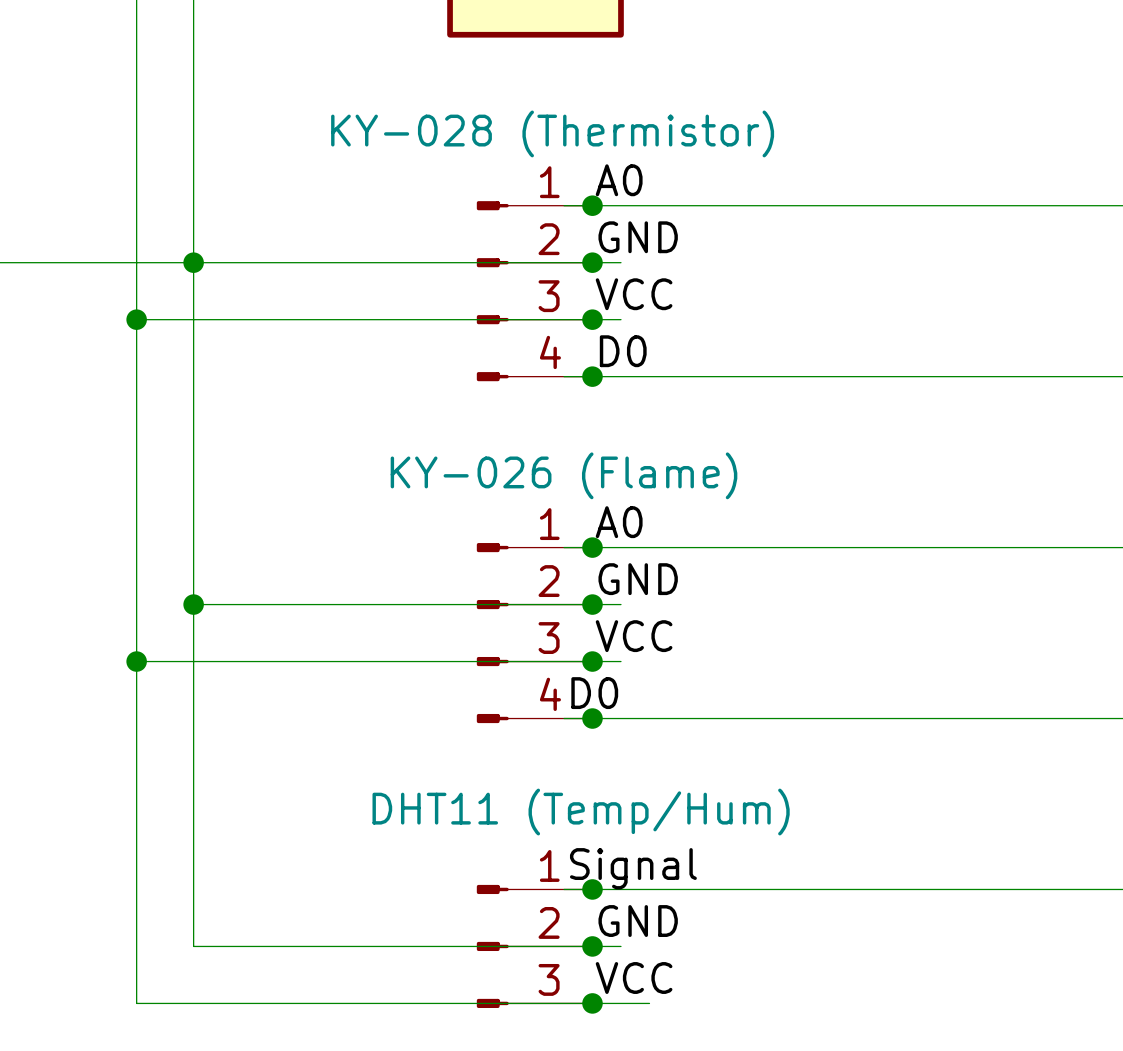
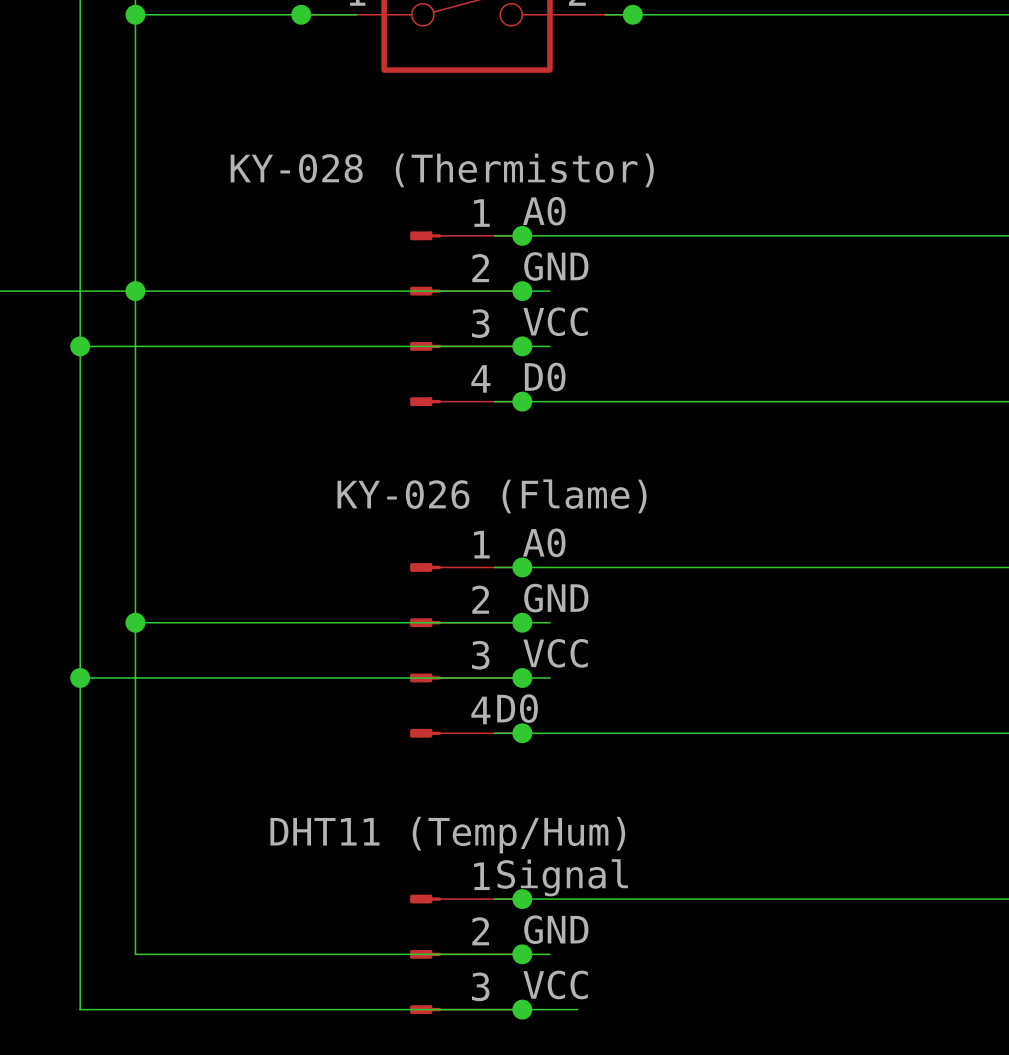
part value position: KY-028 (Thermistor) (552, 133) -> KY-028 (Thermistor) (442, 170)
part value position: DHT11 (Temp/Hum) (581, 812) -> DHT11 (Temp/Hum) (447, 835)

